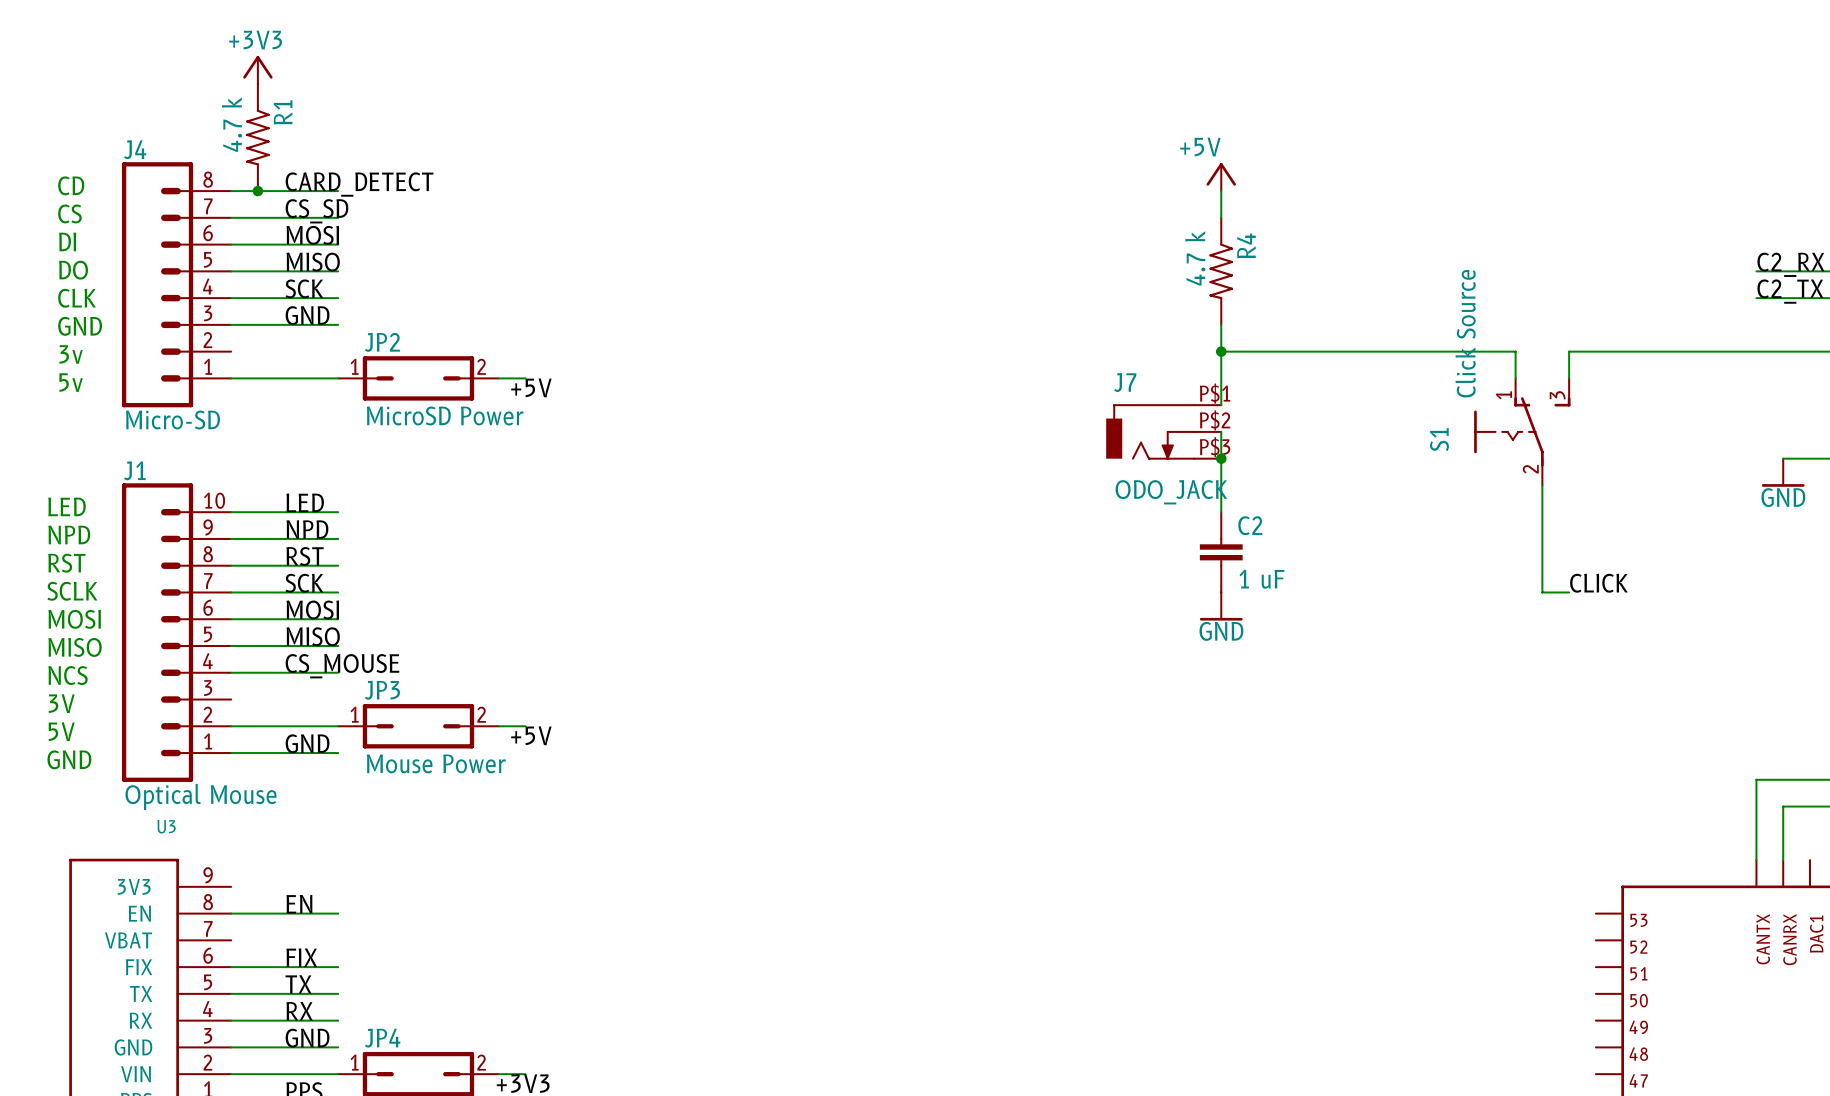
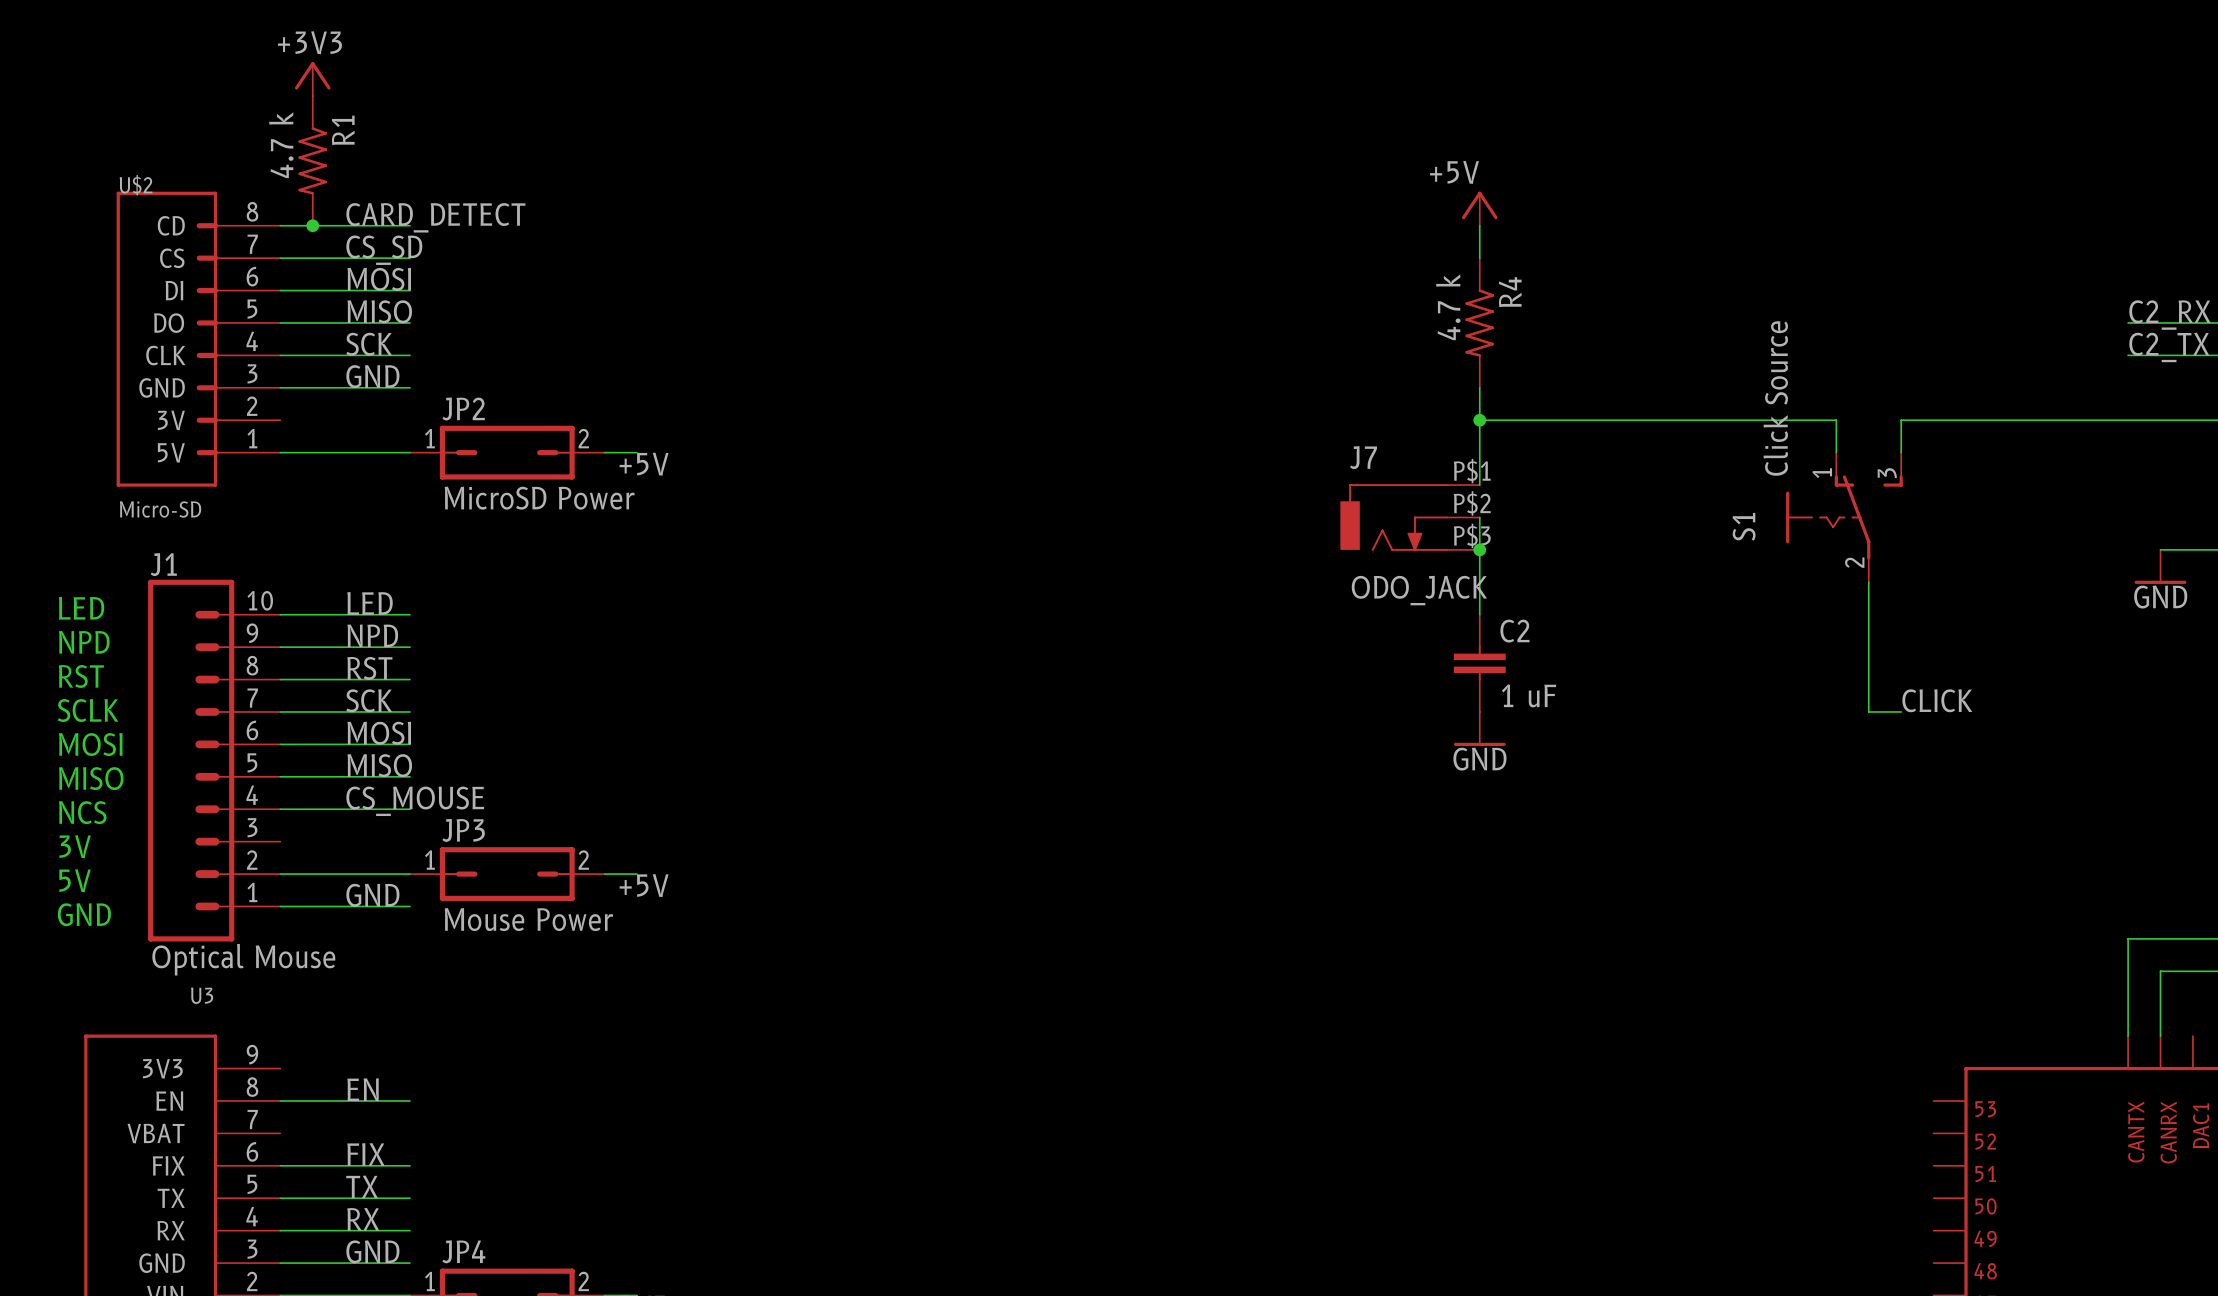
text: CD (71, 185) -> none
text: CS (69, 213) -> none
text: DI (67, 241) -> none
text: DO (73, 270) -> none
U$2: none -> Micro-SD (198, 339)
J4: Micro-SD (176, 284) -> none
text: CLK (77, 298) -> none
text: GND (80, 326) -> none
text: 3v (71, 354) -> none
text: 5v (71, 382) -> none

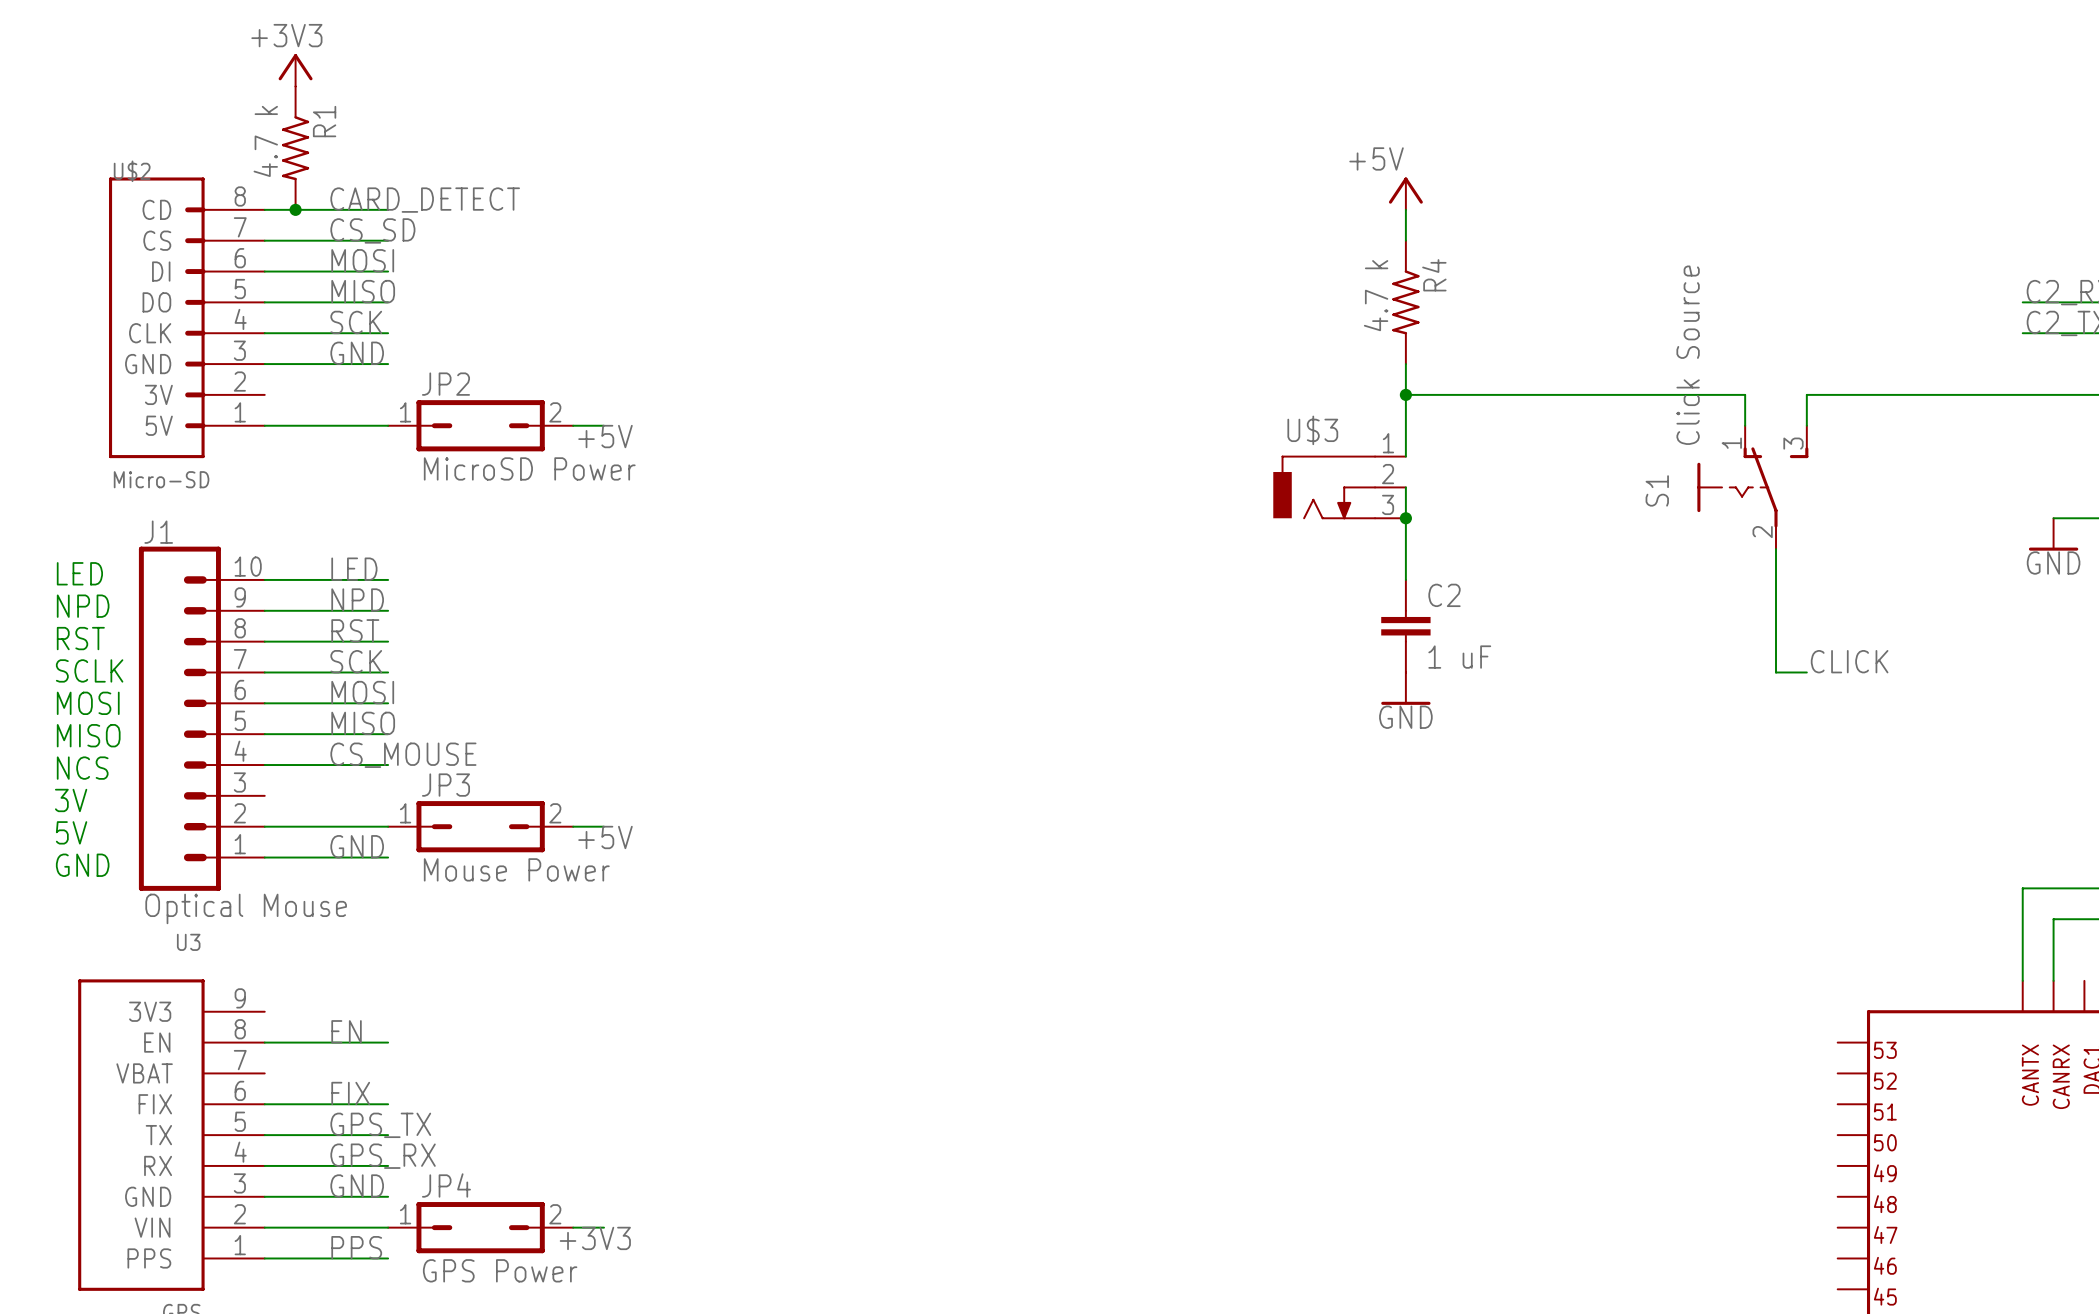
J7 name: J7 (1363, 457) -> U$3 (1312, 430)
J7 pin number: P$1 (1472, 471) -> 1 (1388, 443)
J7 pin number: P$2 (1472, 503) -> 2 (1388, 474)
J7 pin number: P$3 (1472, 535) -> 3 (1388, 504)
J7 value: ODO_JACK (1419, 590) -> none
label: TX (362, 1186) -> GPS_TX (380, 1125)
label: RX (363, 1219) -> GPS_RX (383, 1156)

